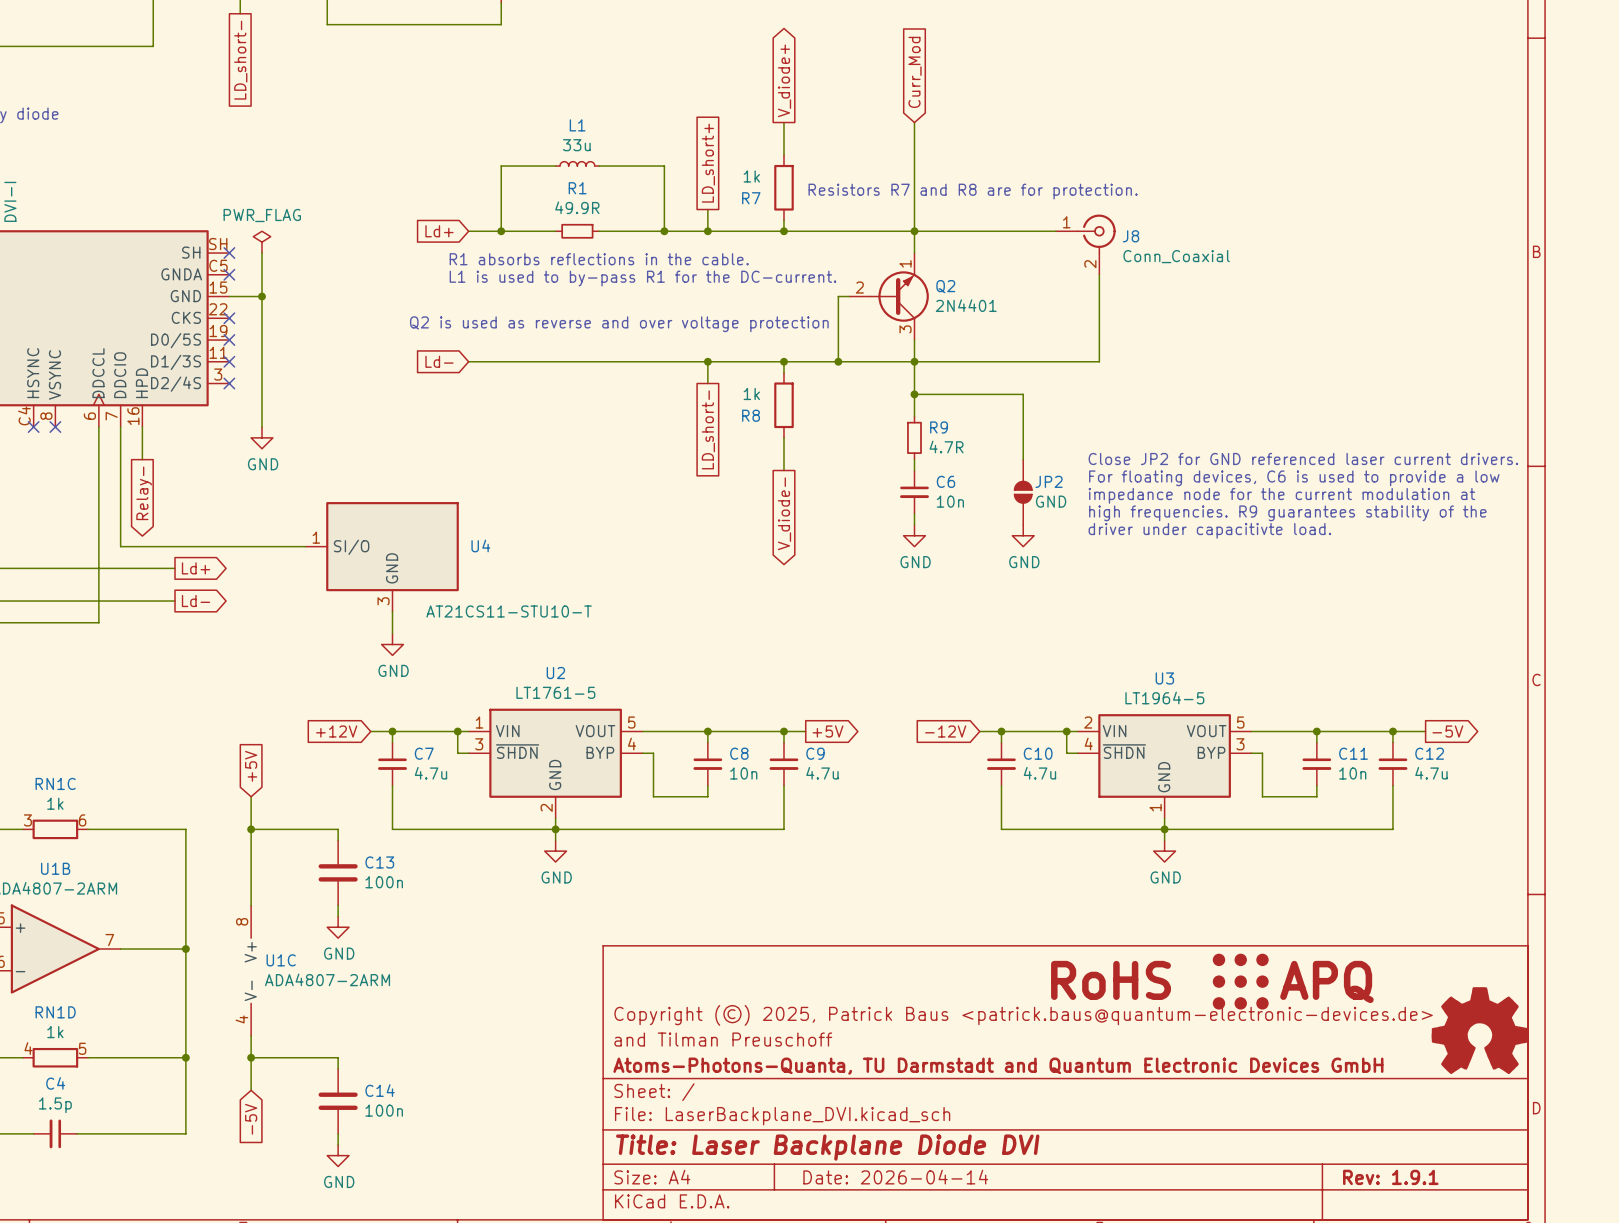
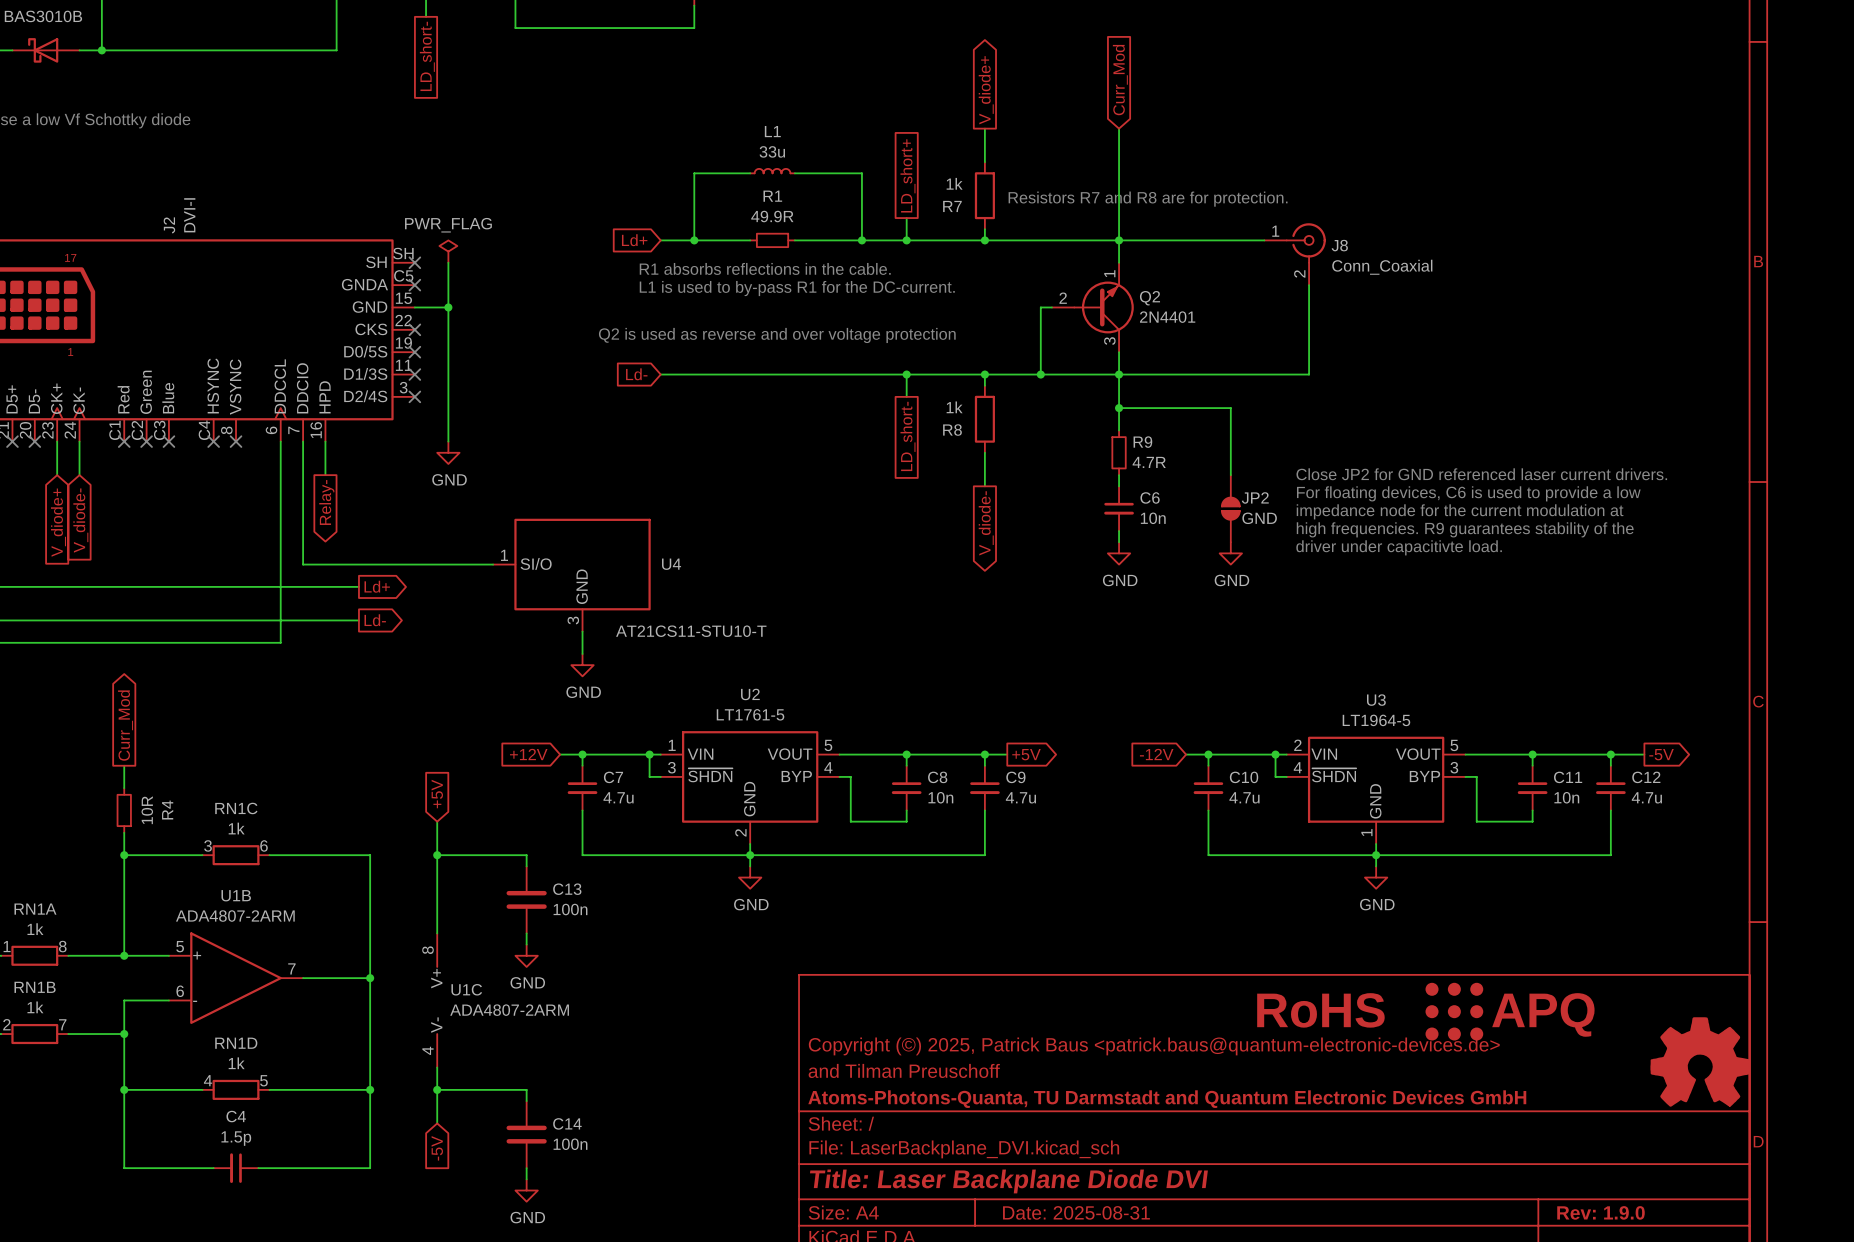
title block: Date: 2026-04-14 (895, 1177) -> Date: 2025-08-31 (1076, 1212)
title block: Rev: 1.9.1 (1390, 1177) -> Rev: 1.9.0 (1600, 1212)

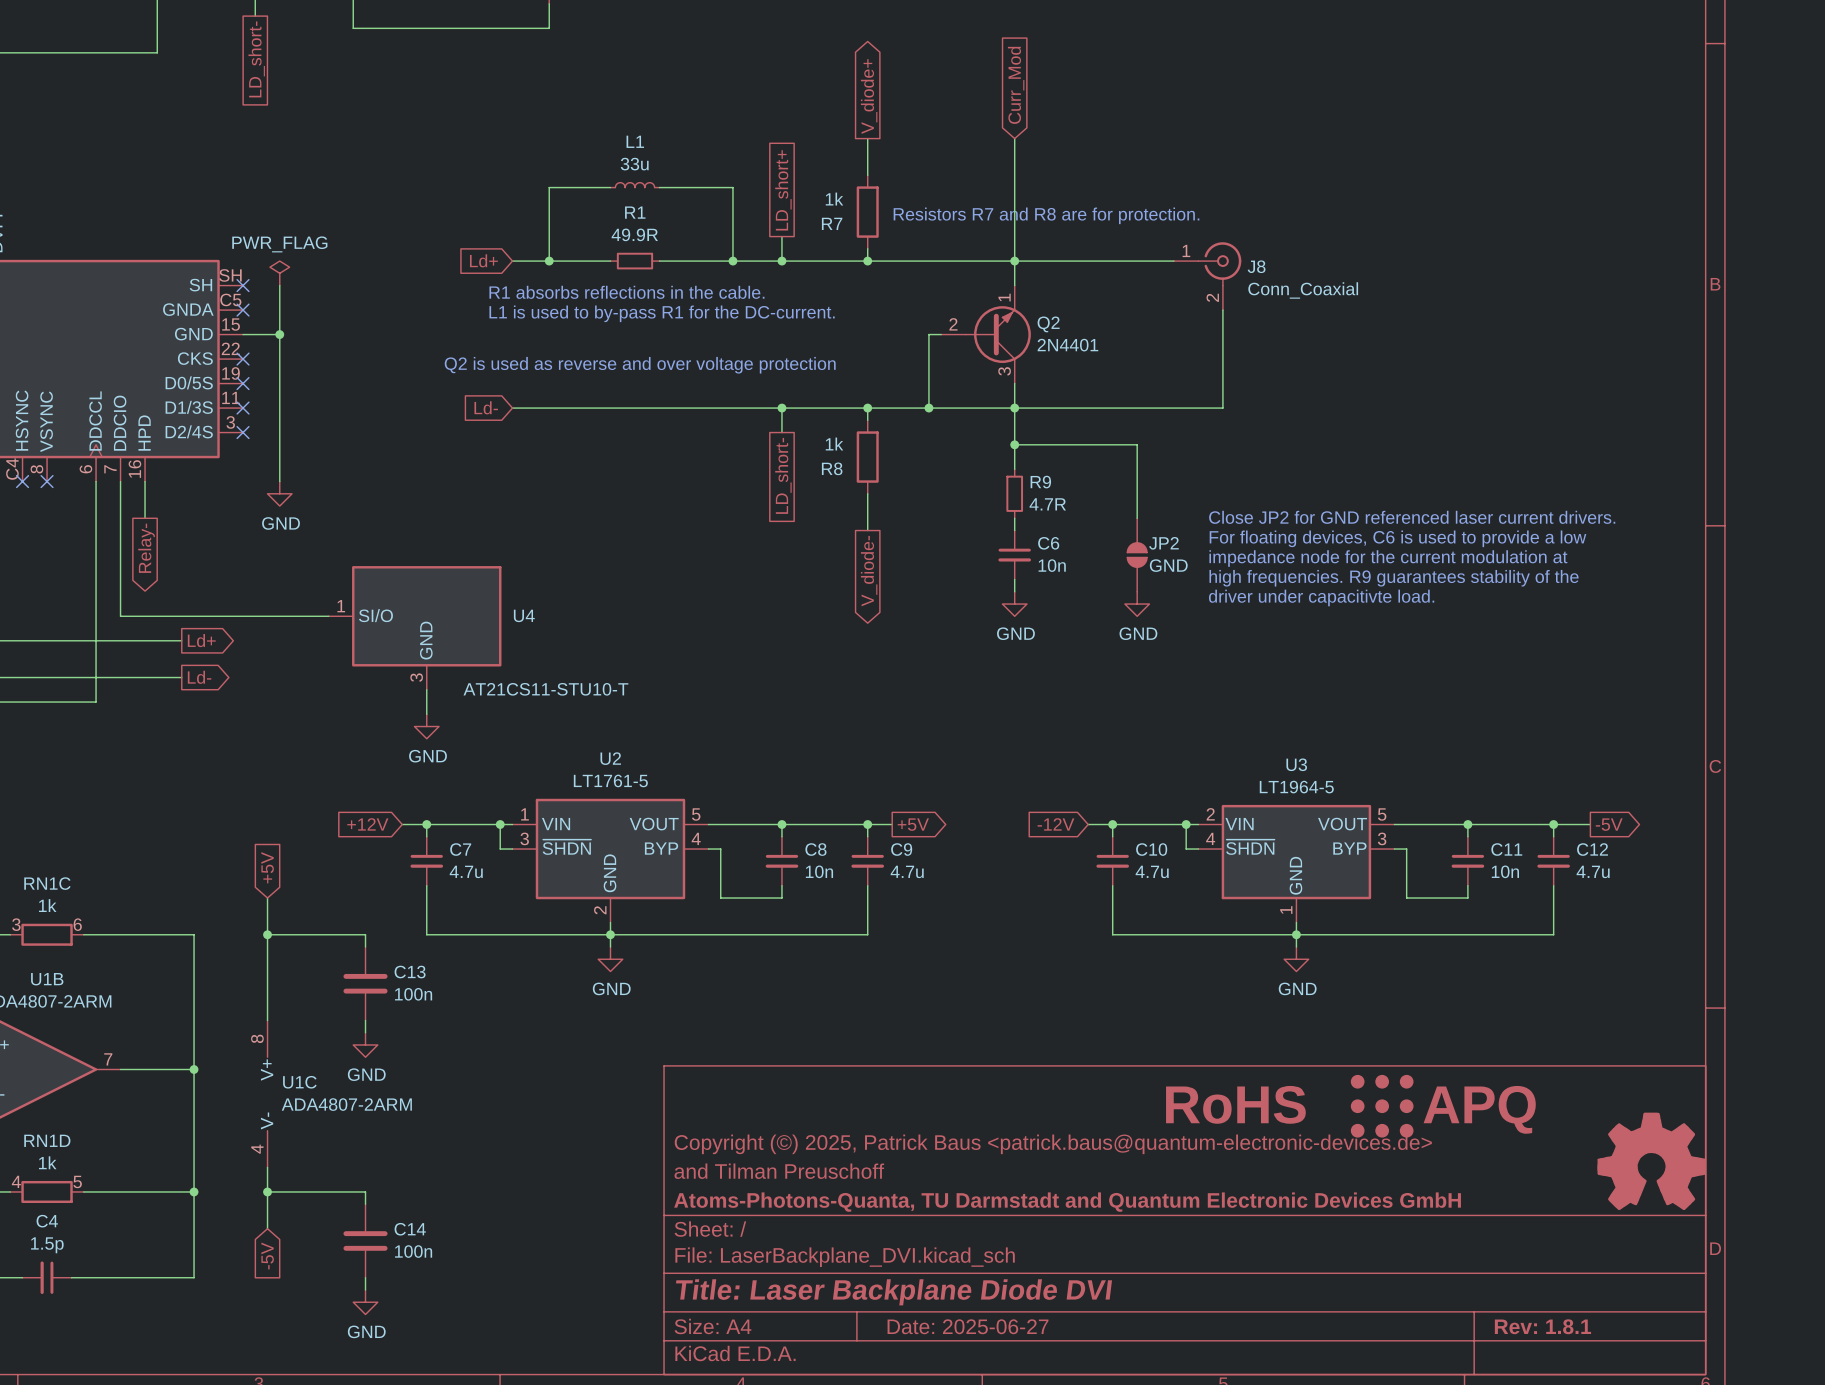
title block: Date: 2025-08-31 (1076, 1212) -> Date: 2025-06-27 (968, 1326)
title block: Rev: 1.9.0 (1600, 1212) -> Rev: 1.8.1 (1542, 1326)

